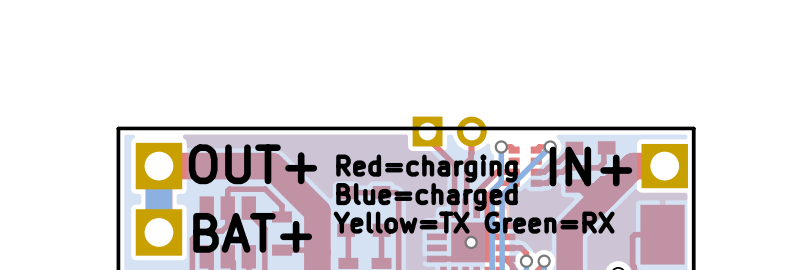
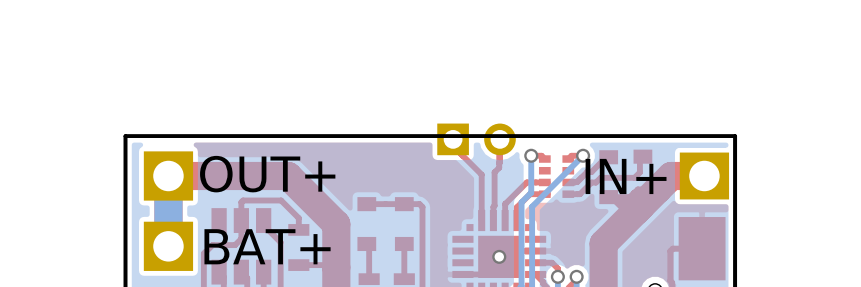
text: Red=charging (426, 168) -> none
text: Blue=charged (426, 197) -> none
text: Yellow=TX Green=RX (474, 222) -> none

